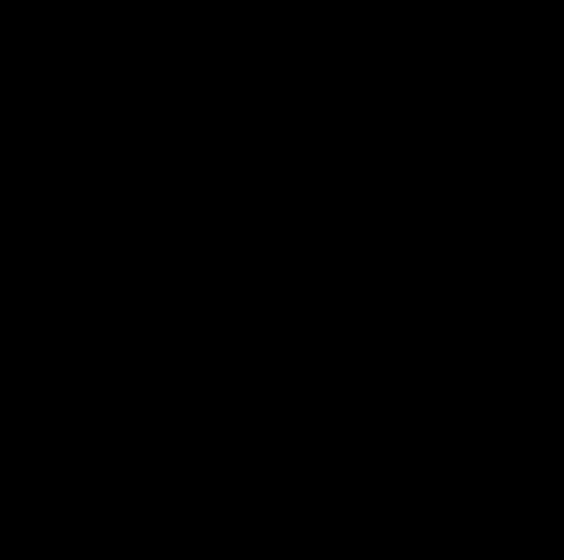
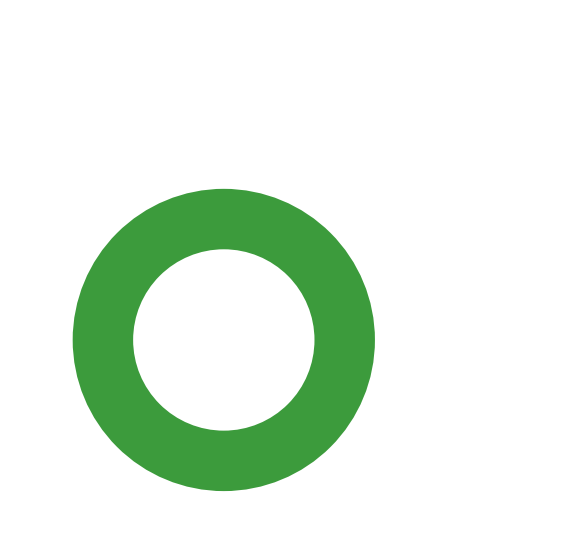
part: none -> (223, 339)

